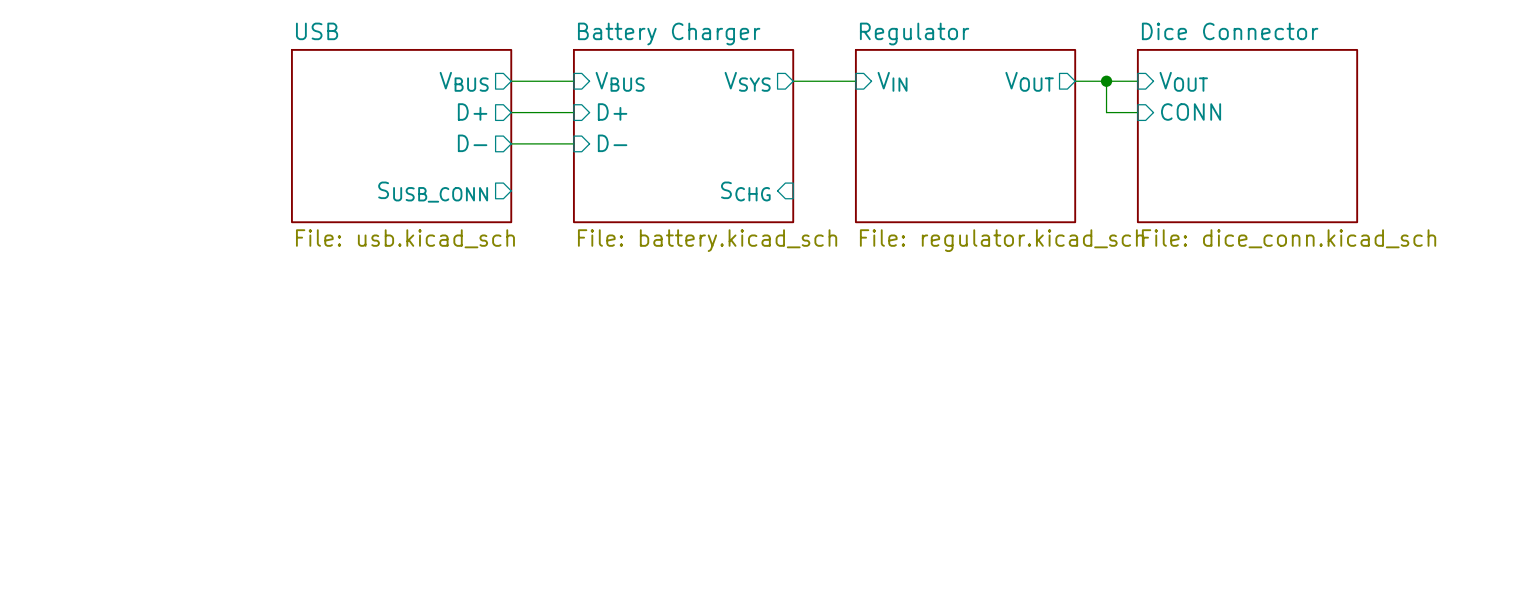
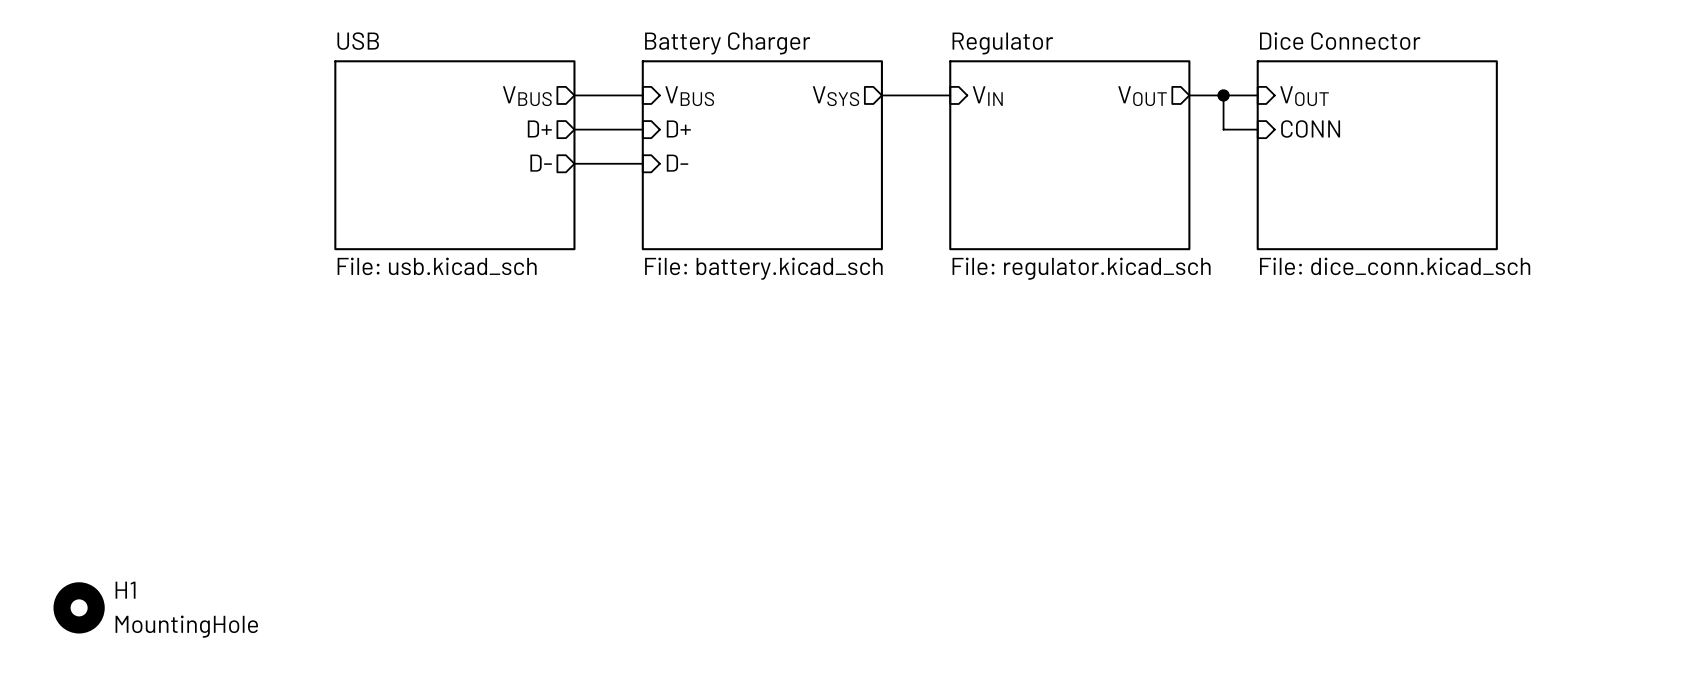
sheet pin: SCHG (745, 191) -> none
sheet pin: SUSB_CONN (433, 192) -> none
H1: none -> MountingHole (79, 607)

